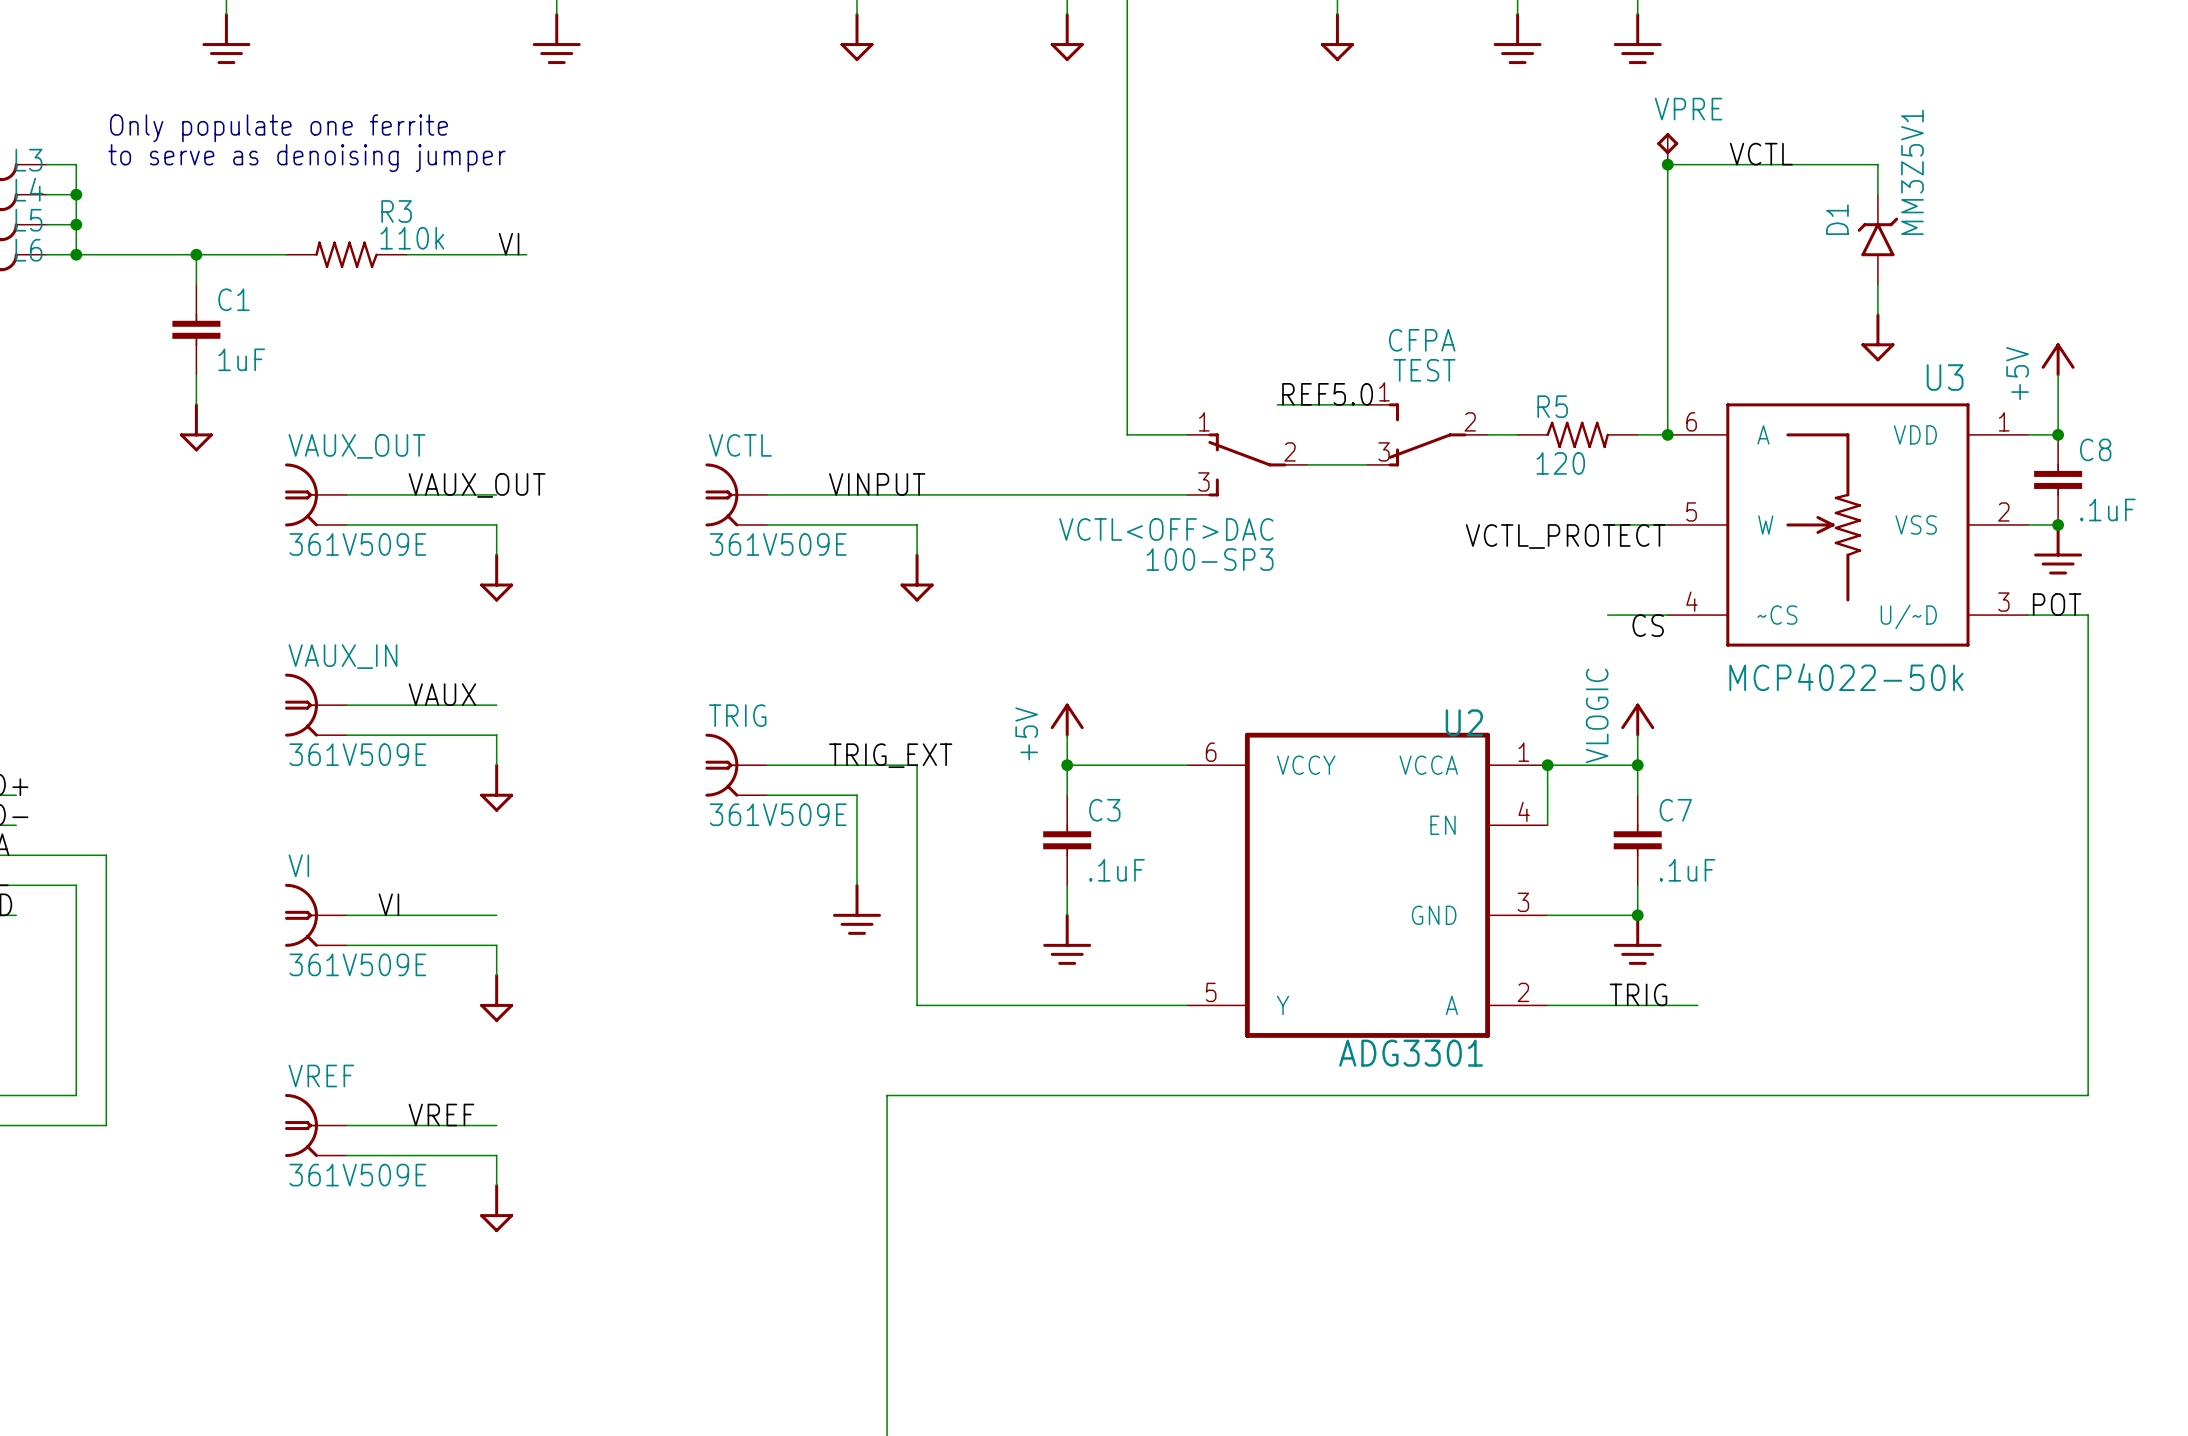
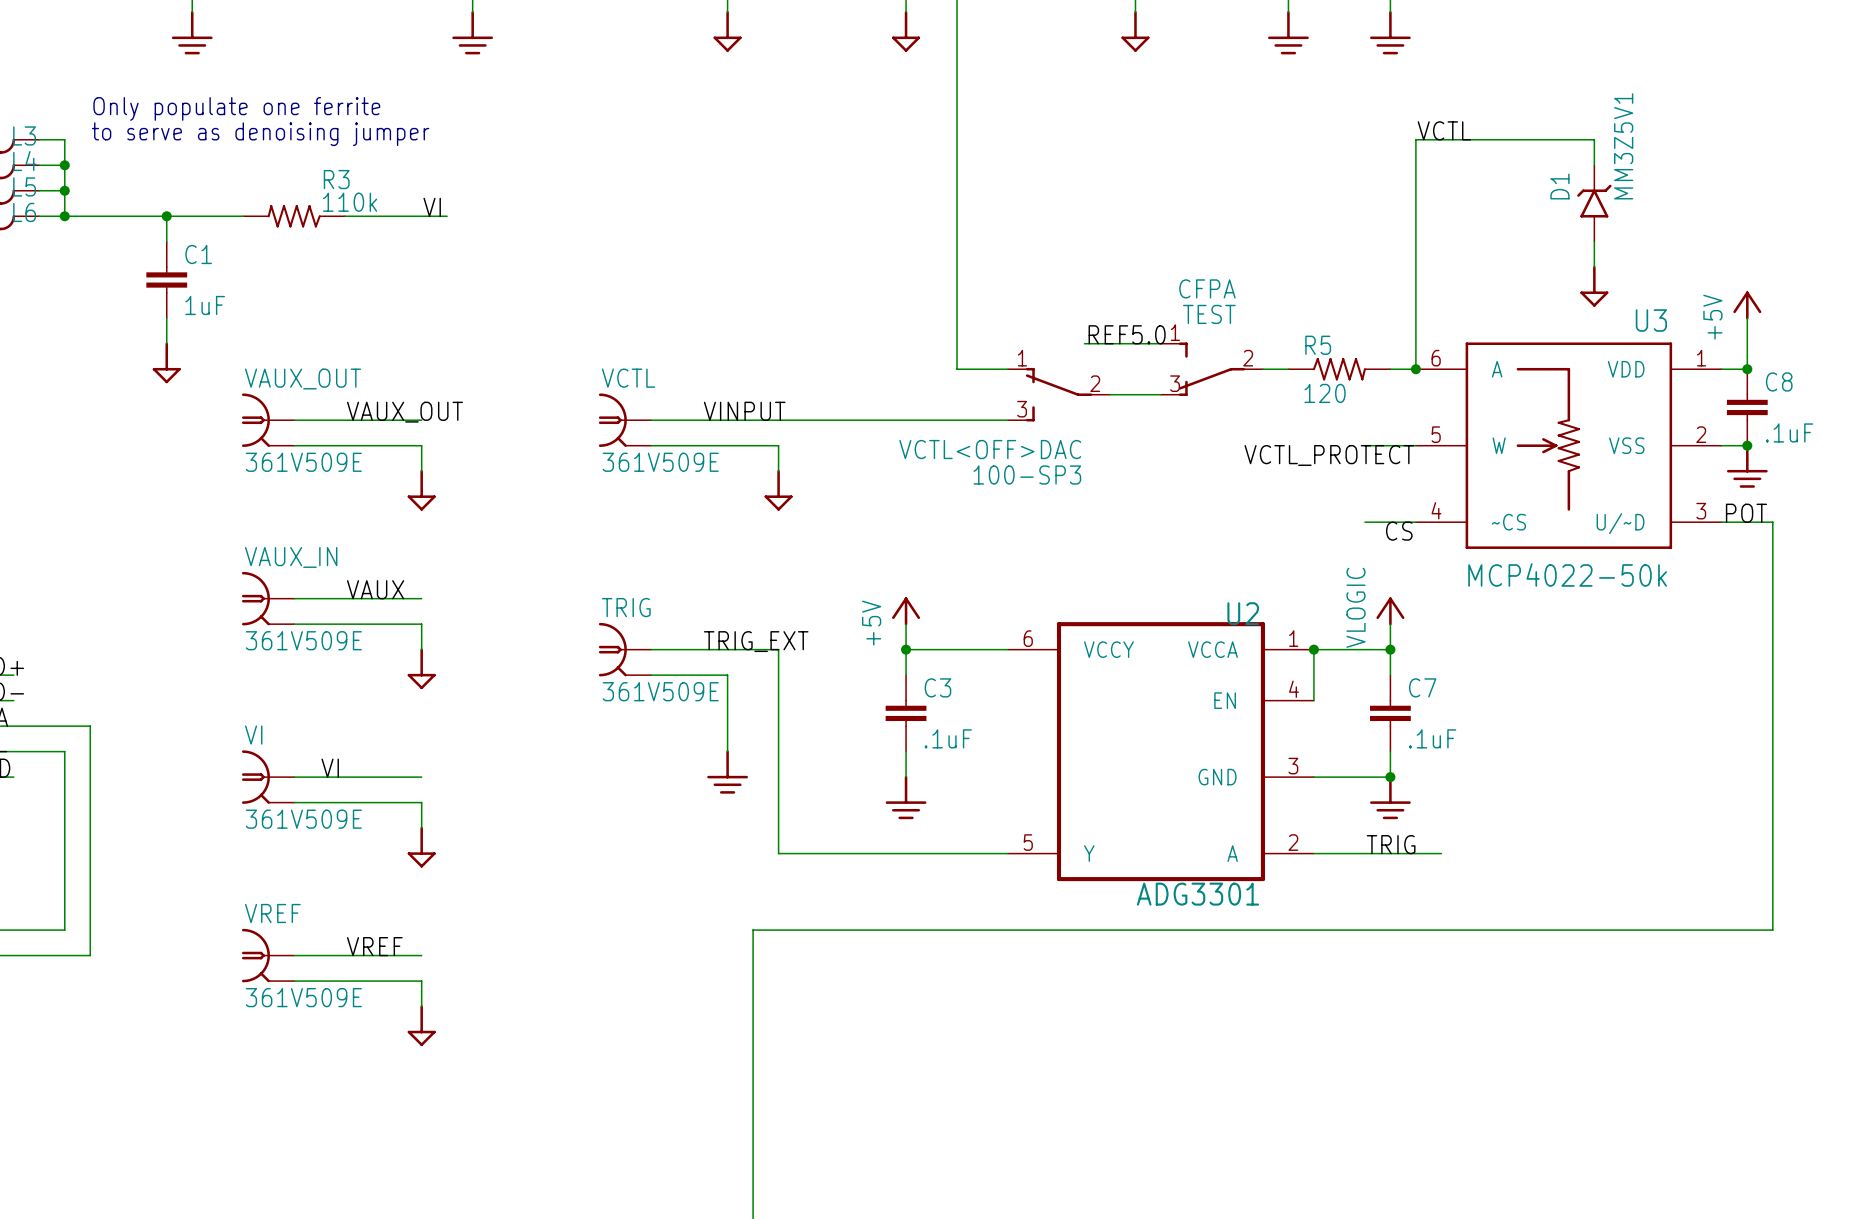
VPRE: (1667, 148) -> none
label position: VCTL (1761, 154) -> VCTL (1444, 130)
junction: (1667, 164) -> none

